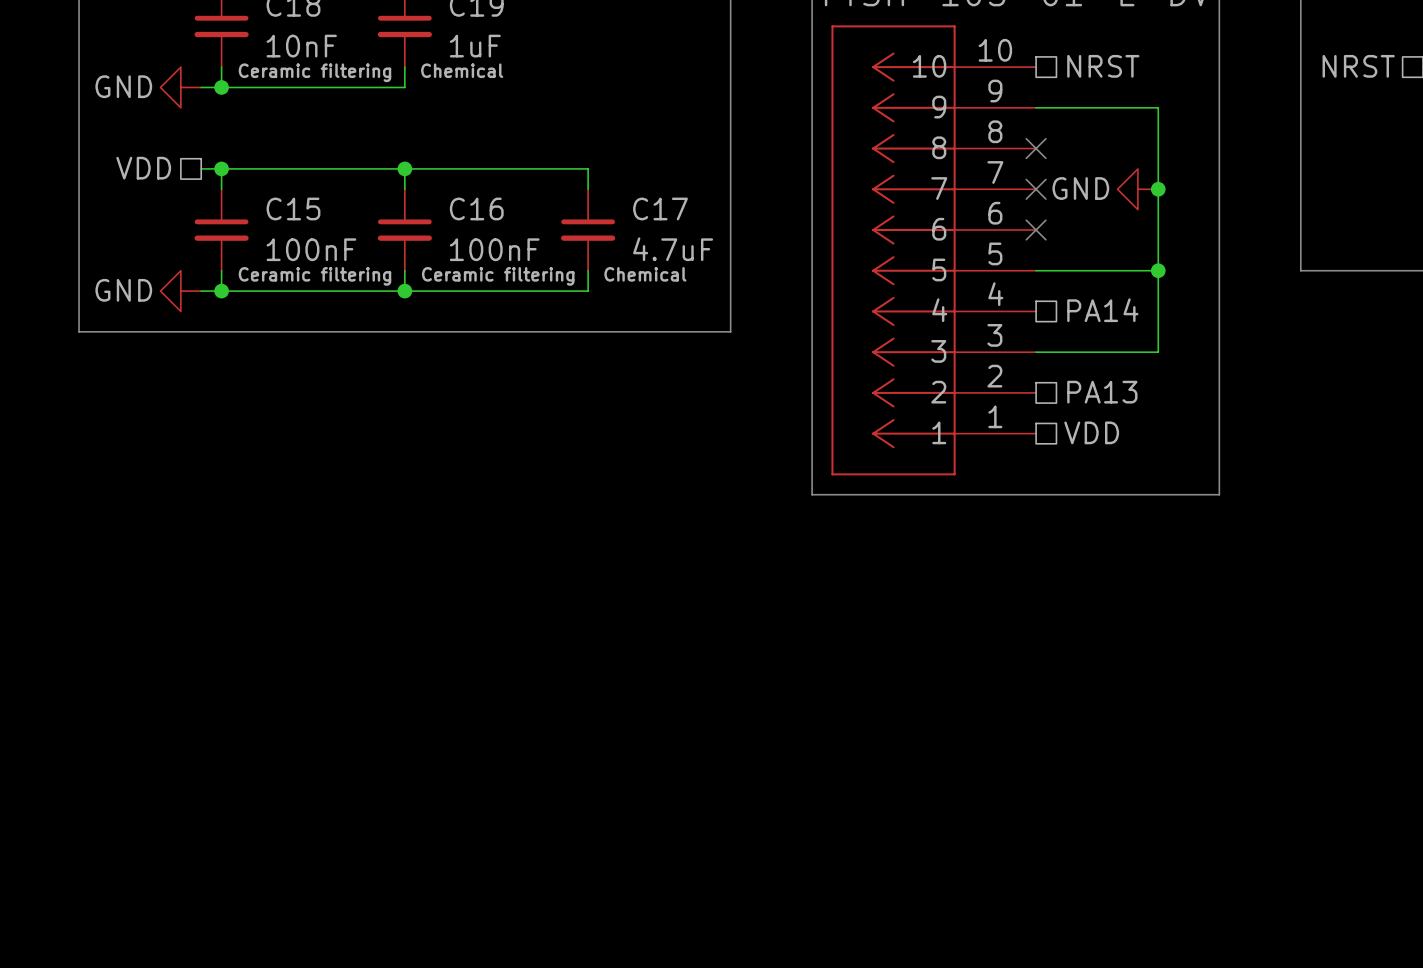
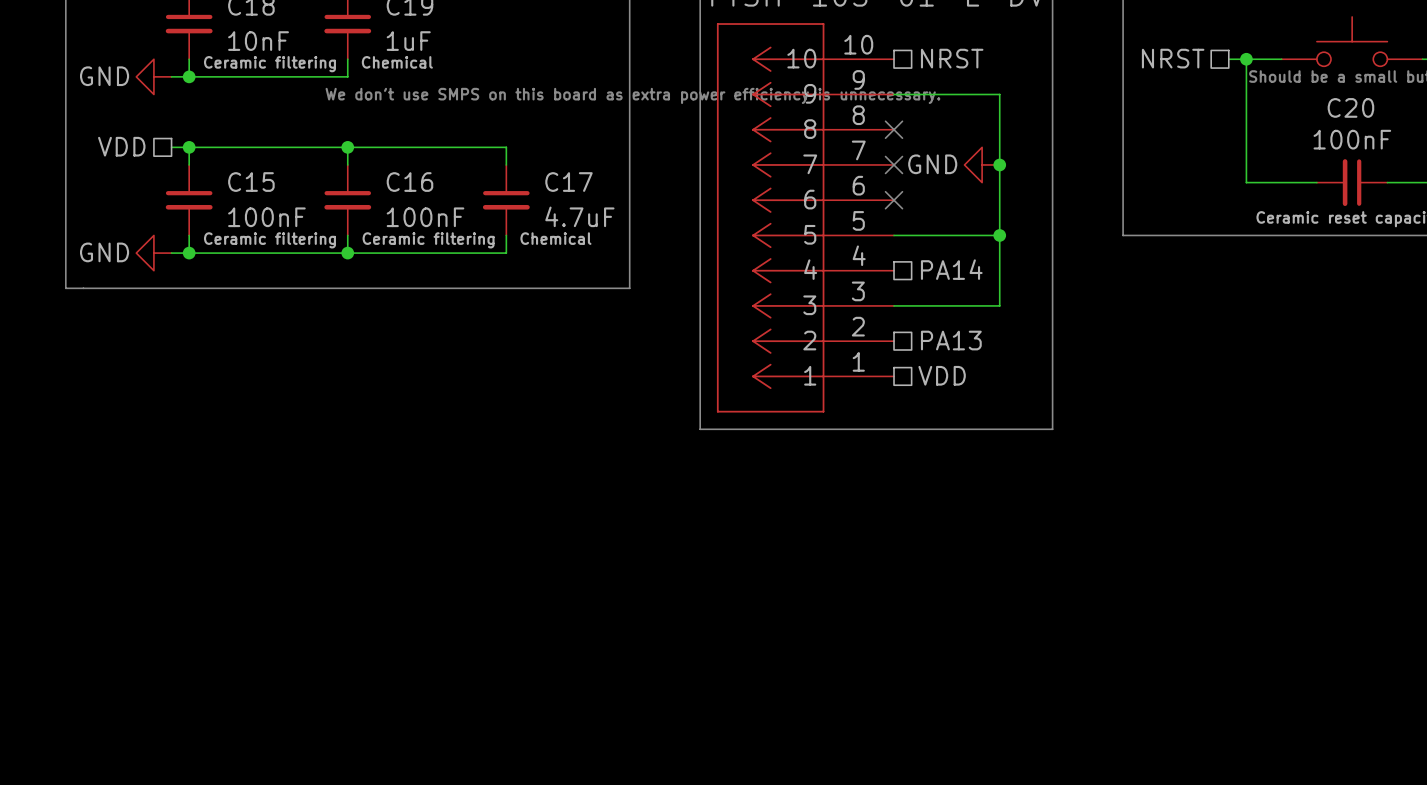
text: none -> We don't use SMPS on this board as extra power efficiency is unnecessary. (632, 95)

